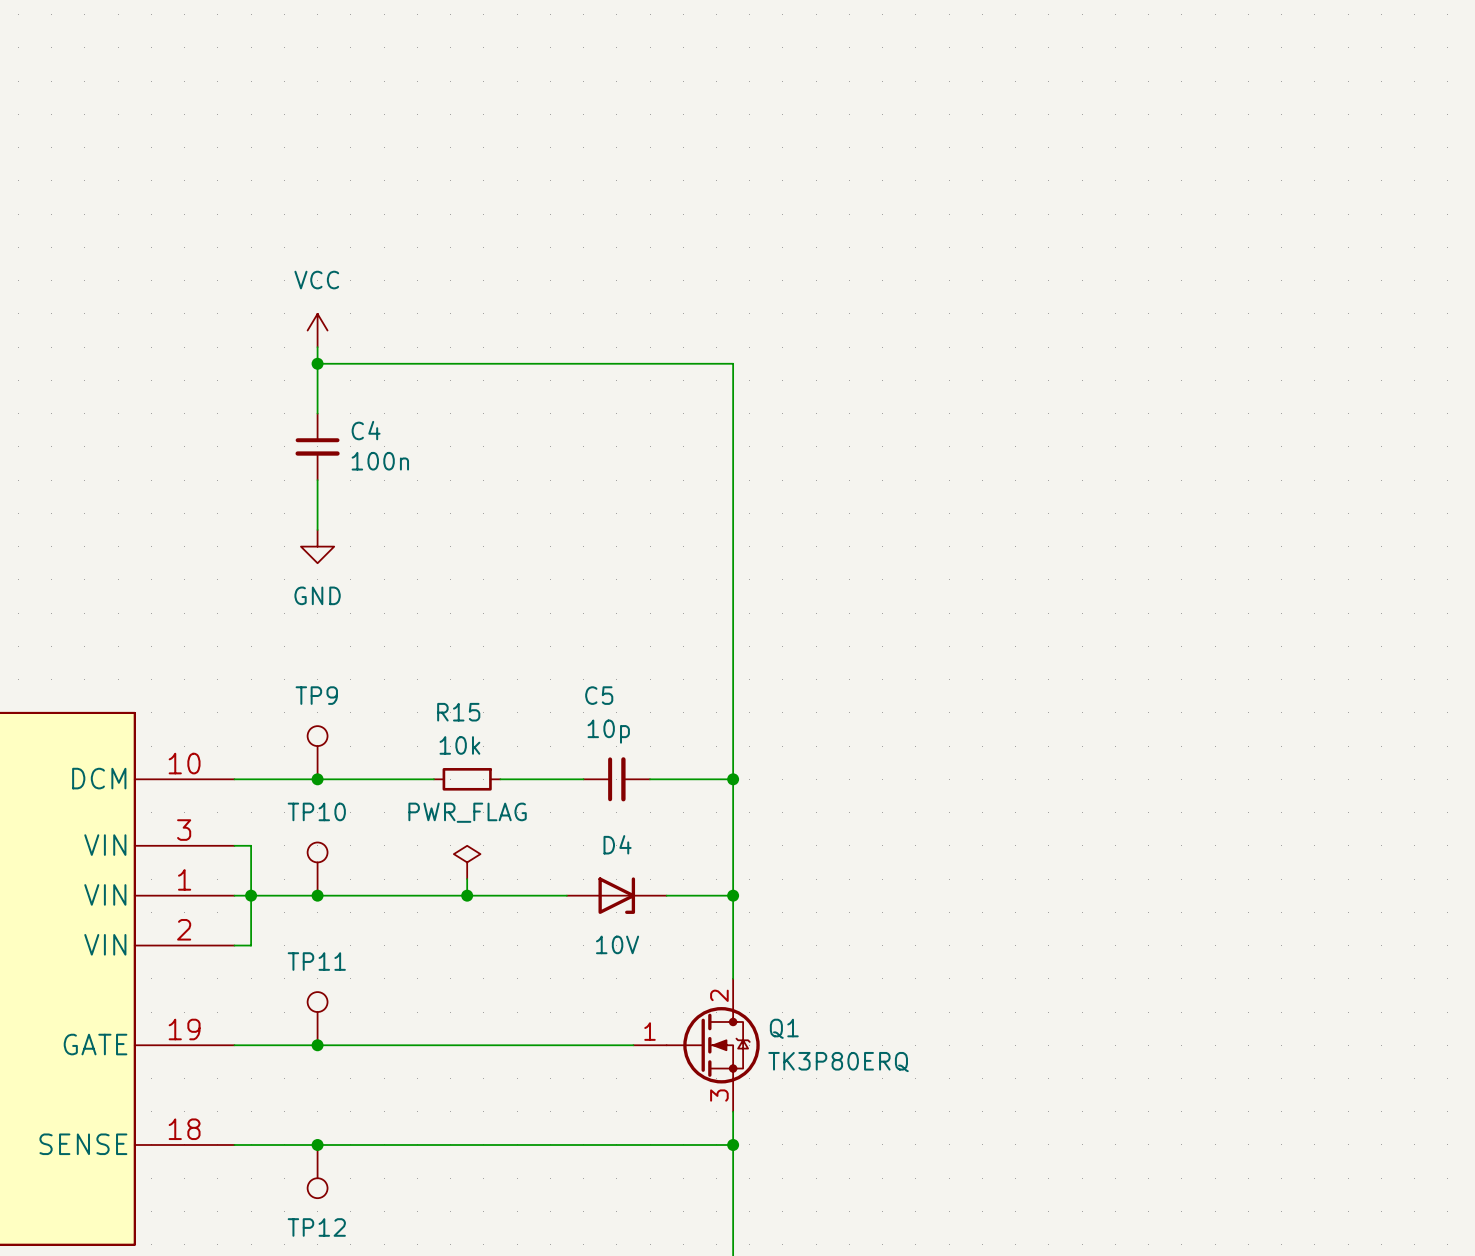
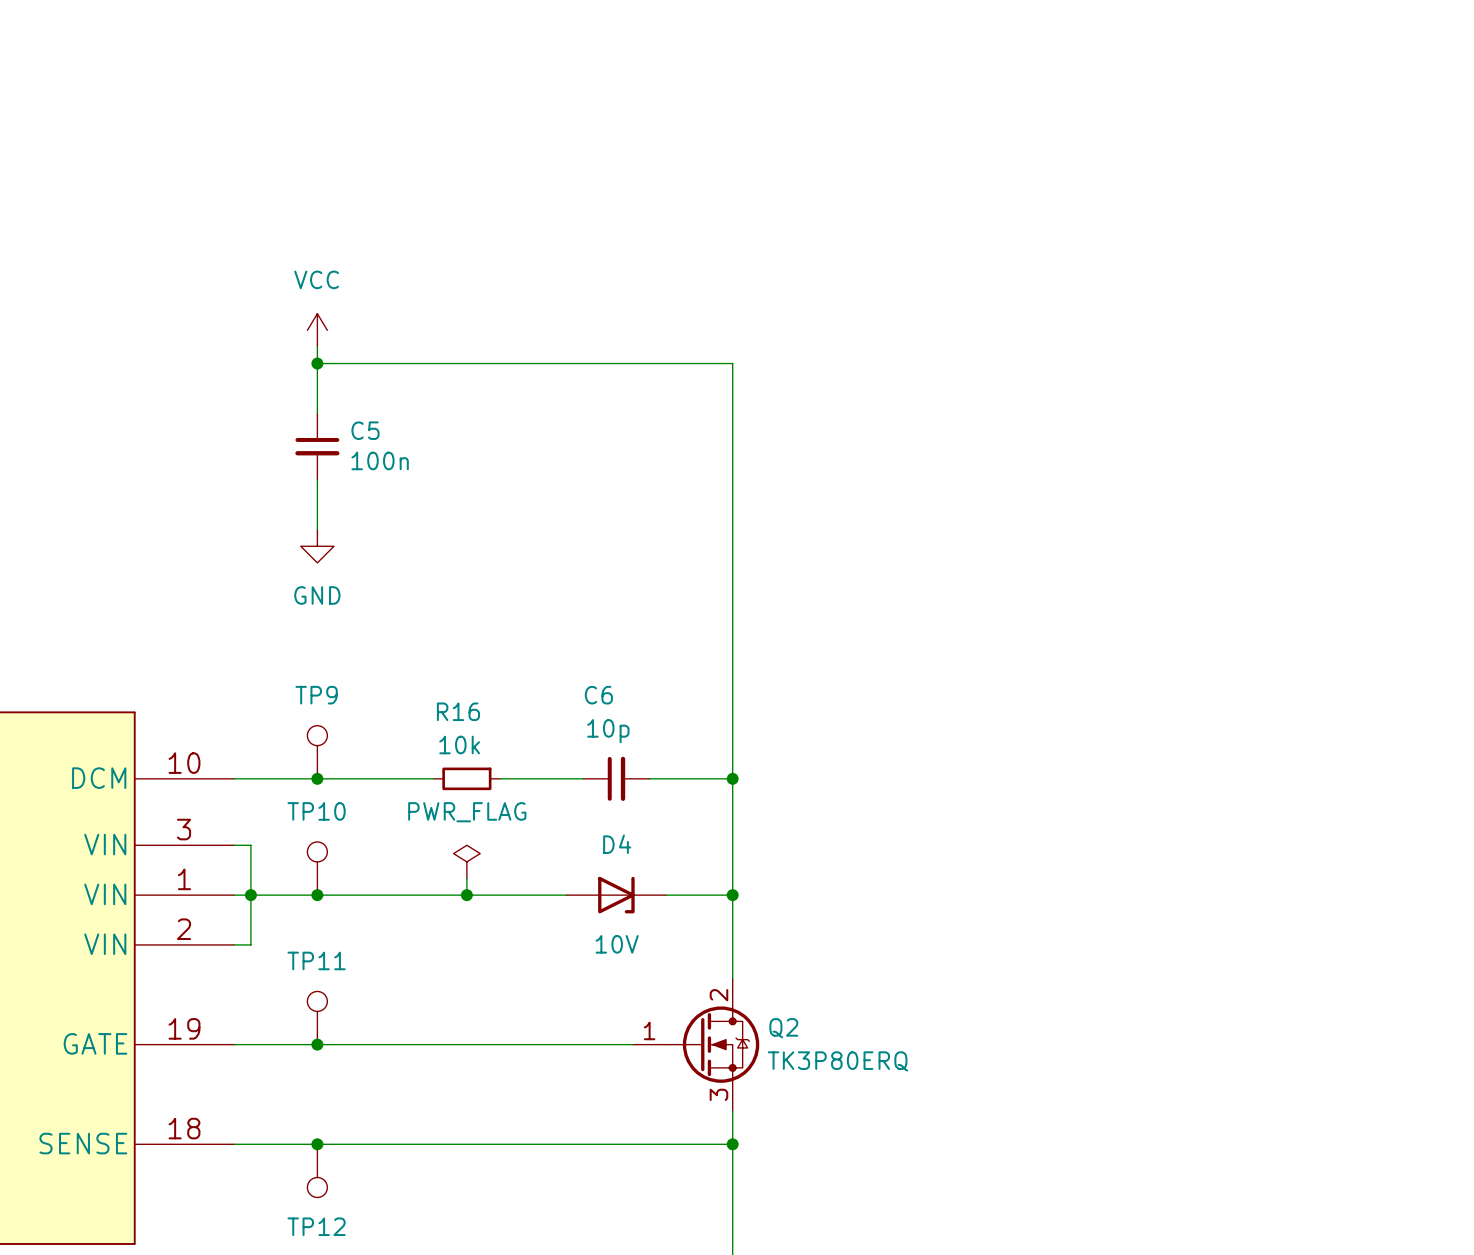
C4 name: C4 (366, 430) -> C5 (365, 430)
C5 name: C5 (599, 695) -> C6 (598, 695)
R15 name: R15 (458, 712) -> R16 (458, 711)
Q1 name: Q1 (784, 1028) -> Q2 (783, 1028)

